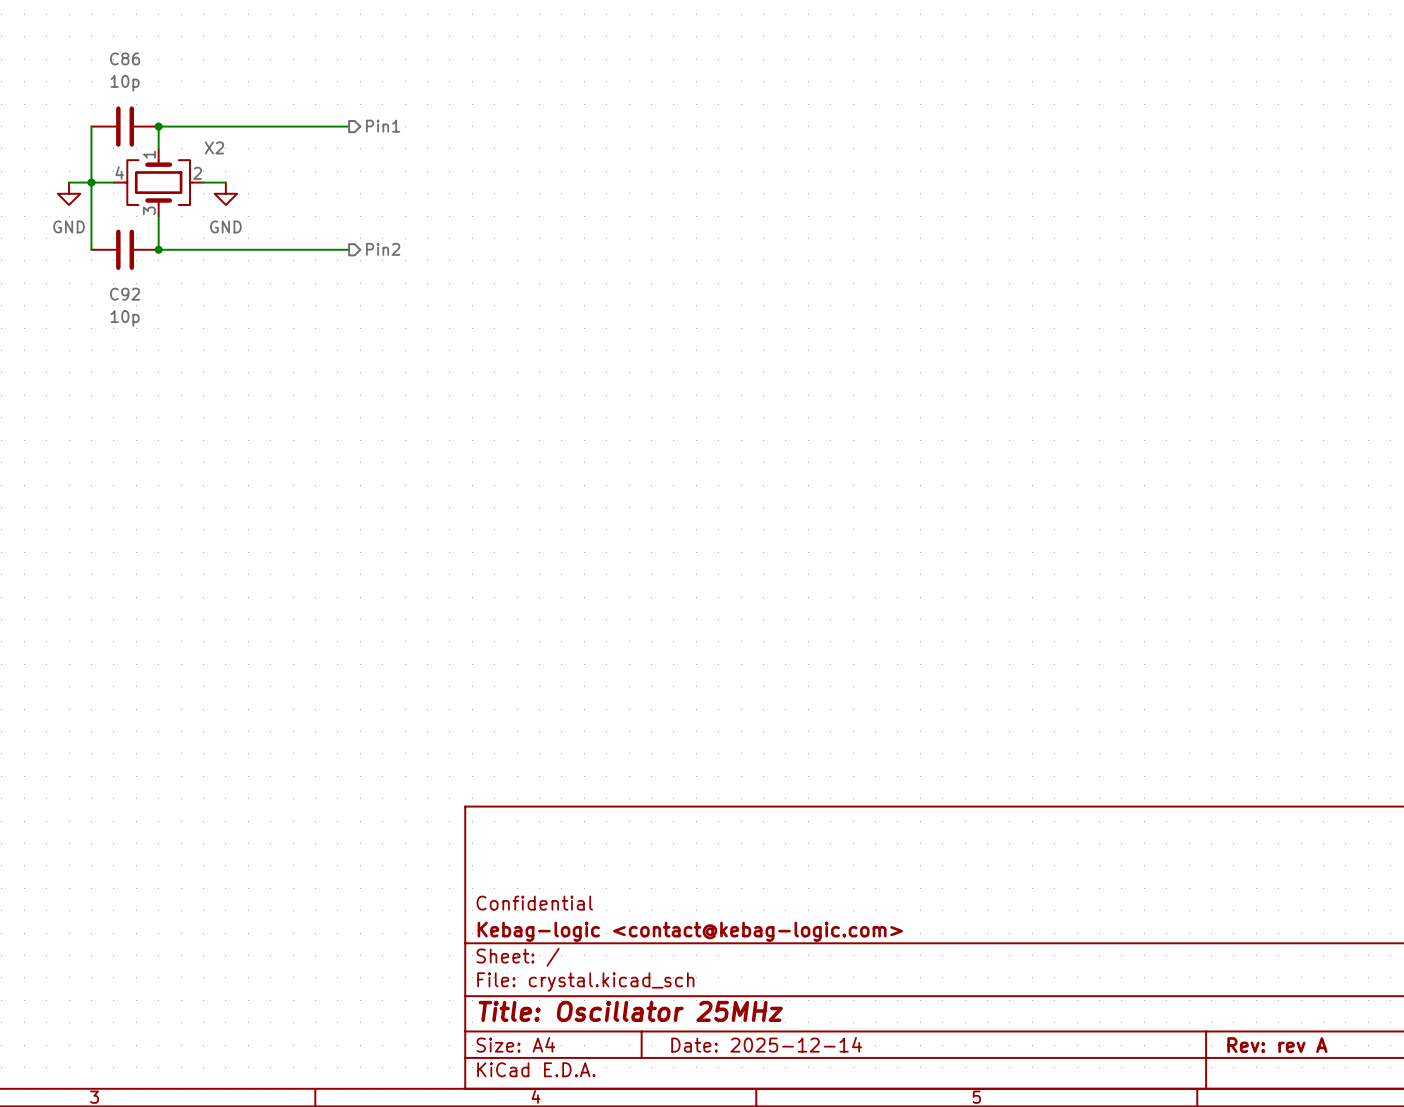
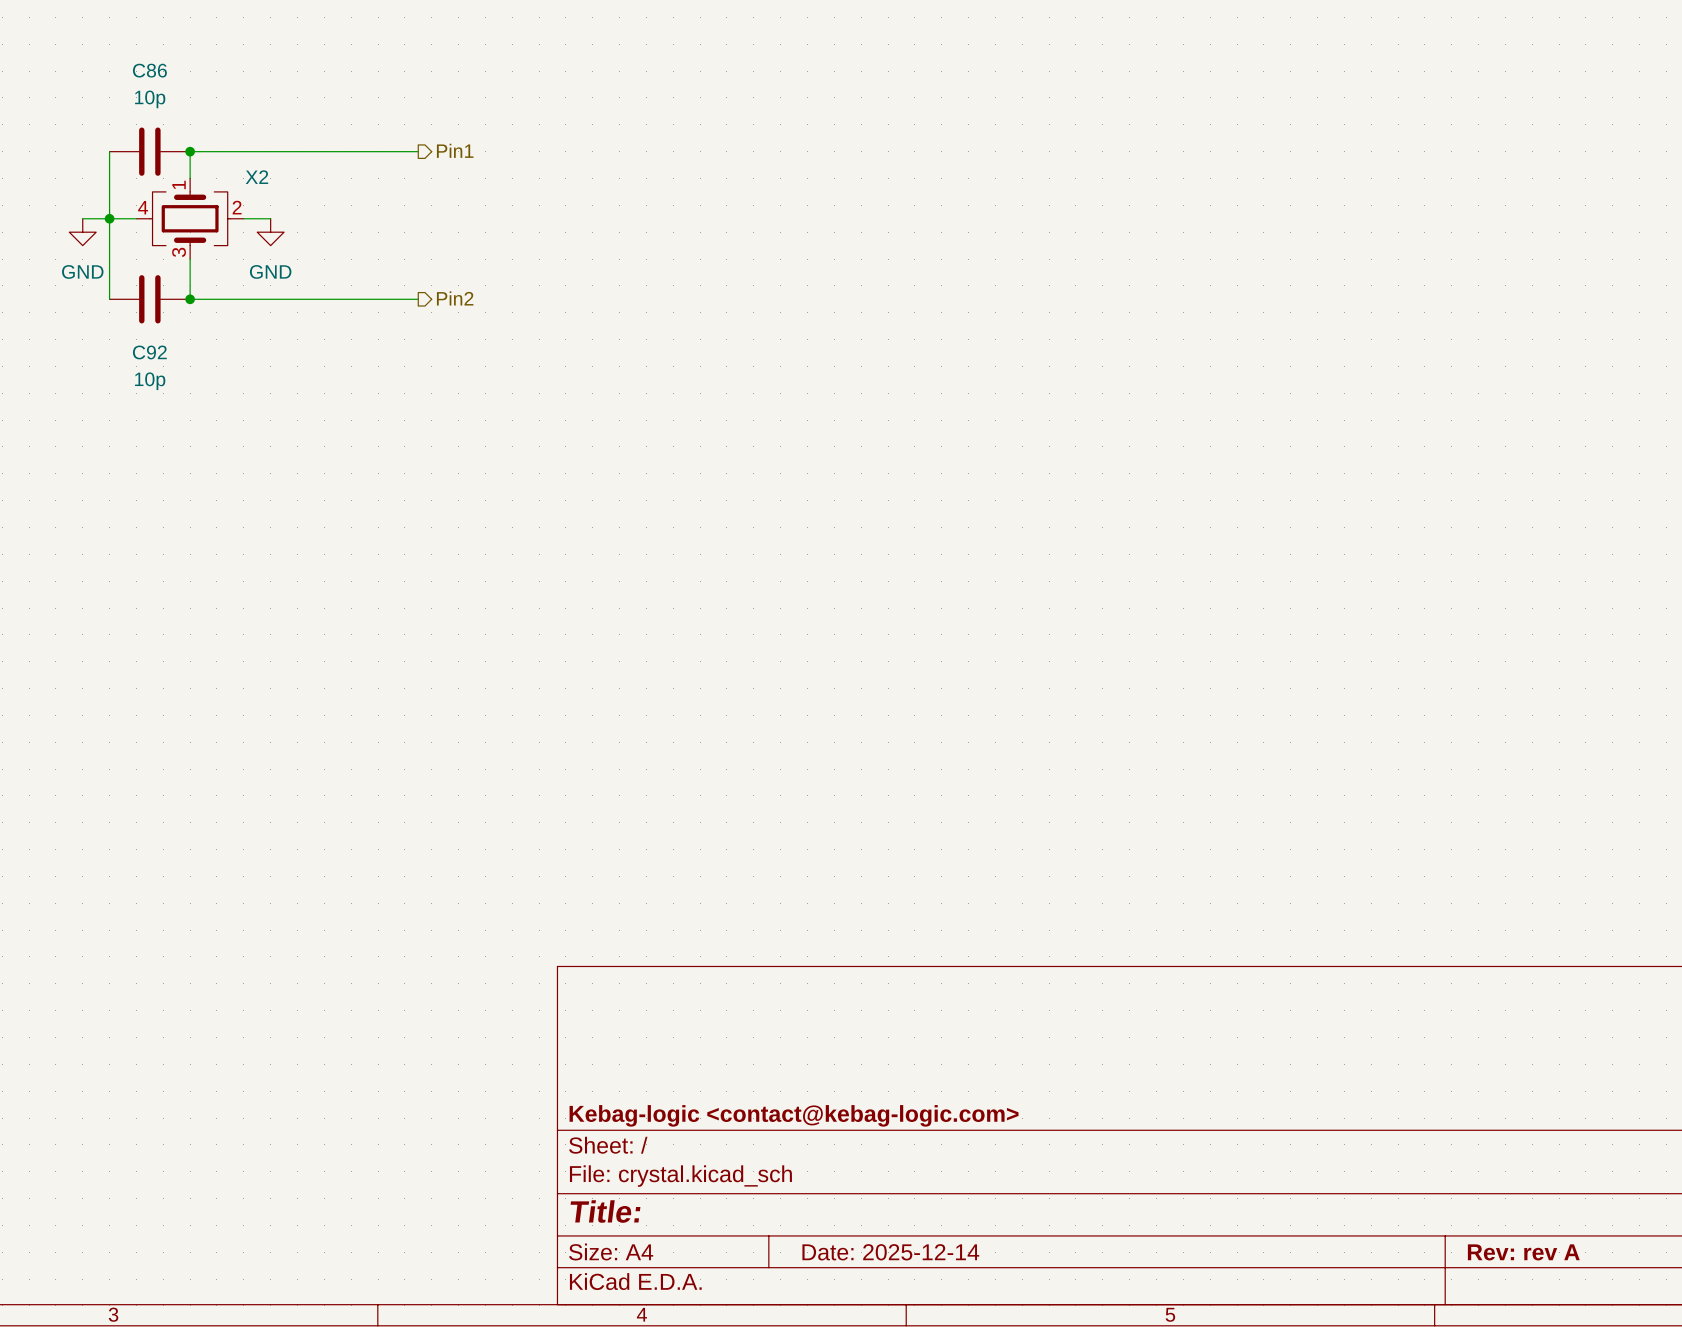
title block: Confidential (534, 903) -> none
title block: Title: Oscillator 25MHz (630, 1011) -> Title: (605, 1211)

